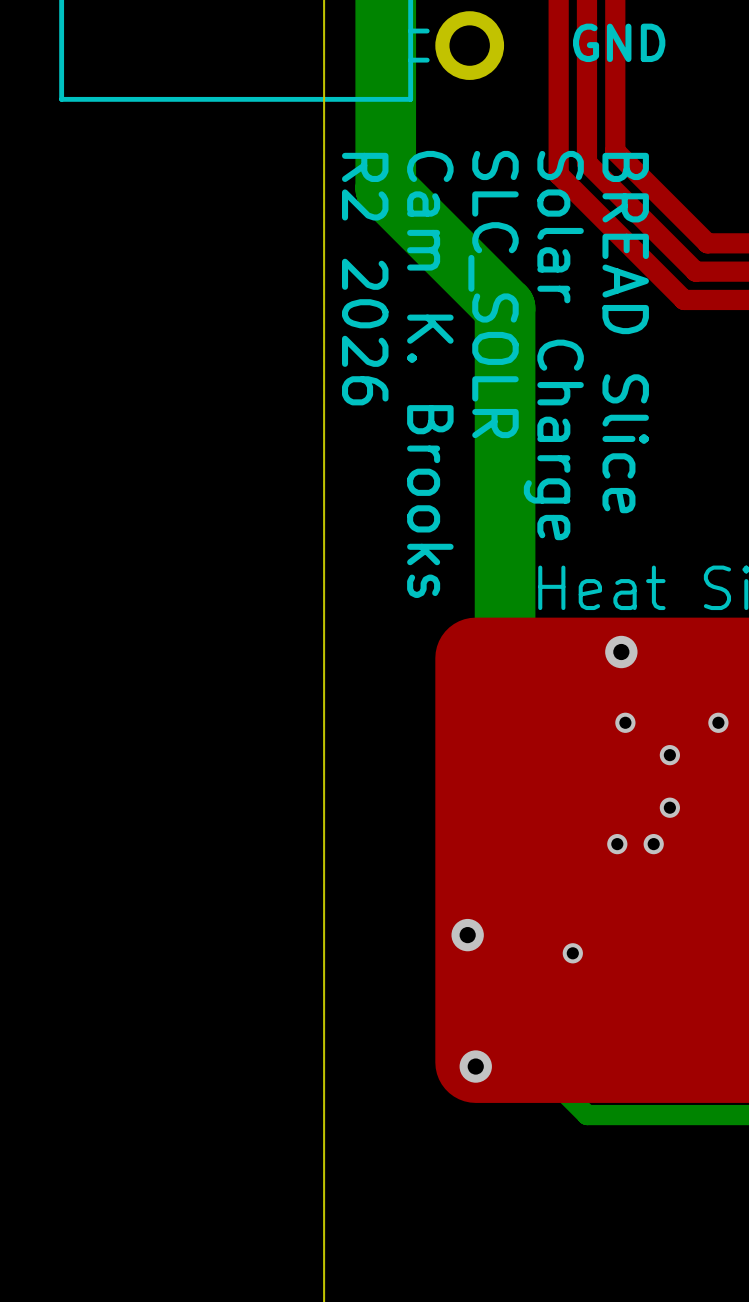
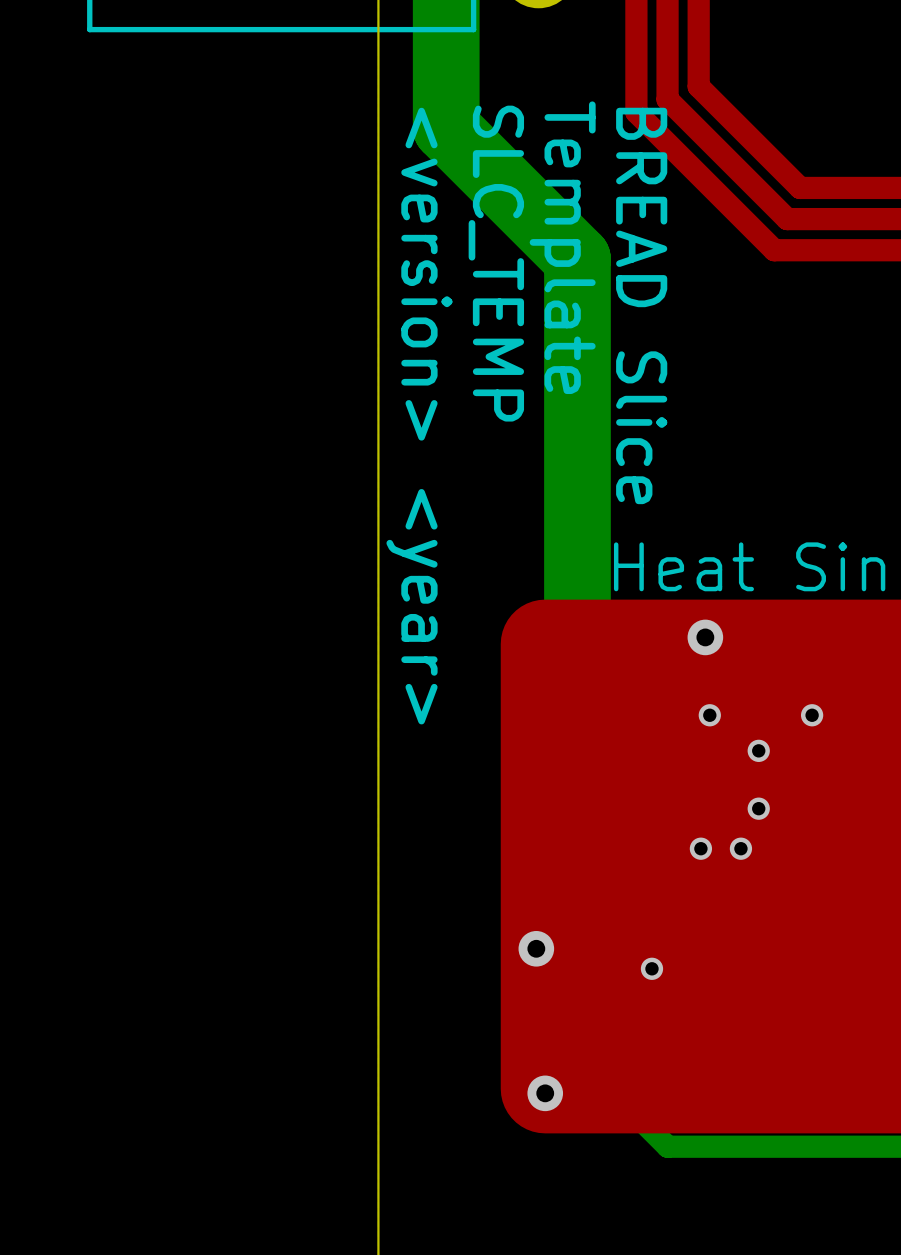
text: R2 2026 (365, 279) -> <version> <year> (419, 416)
text: SLC_SOLR (493, 294) -> Template (562, 247)
text position: BREAD Slice (625, 333) -> BREAD Slice (641, 305)
text: Solar Charge (553, 345) -> none
text: Cam K. Brooks (430, 374) -> SLC_TEMP (496, 263)

